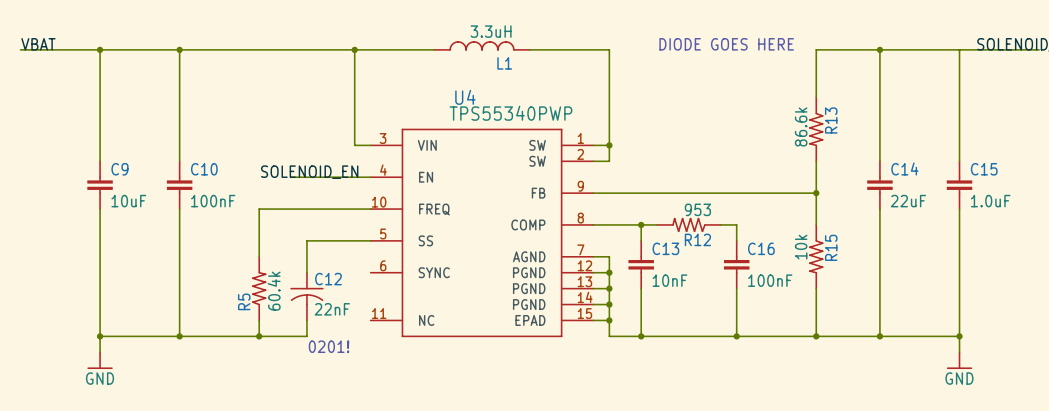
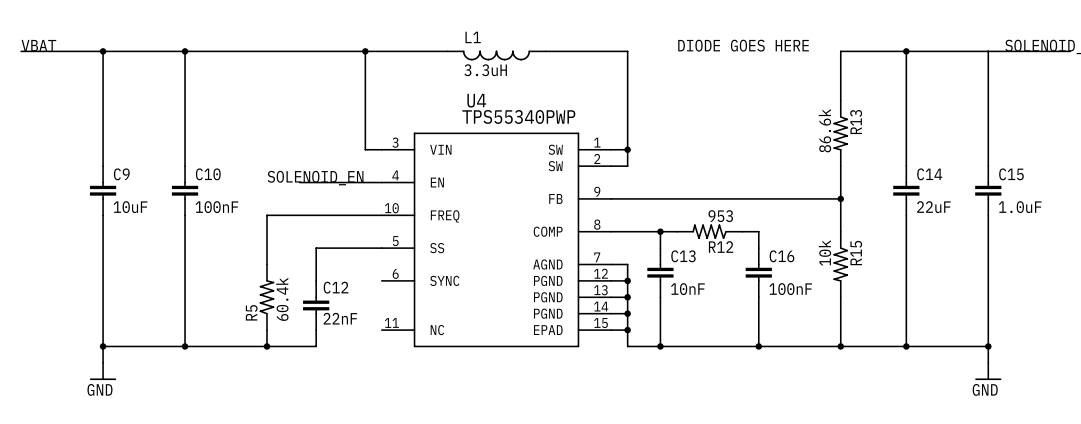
L1 rotation: 0° (482, 45) -> 180° (496, 55)
C12 symbol: [290, 272, 324, 321] -> [303, 280, 330, 331]
text: 0201! (329, 346) -> none

